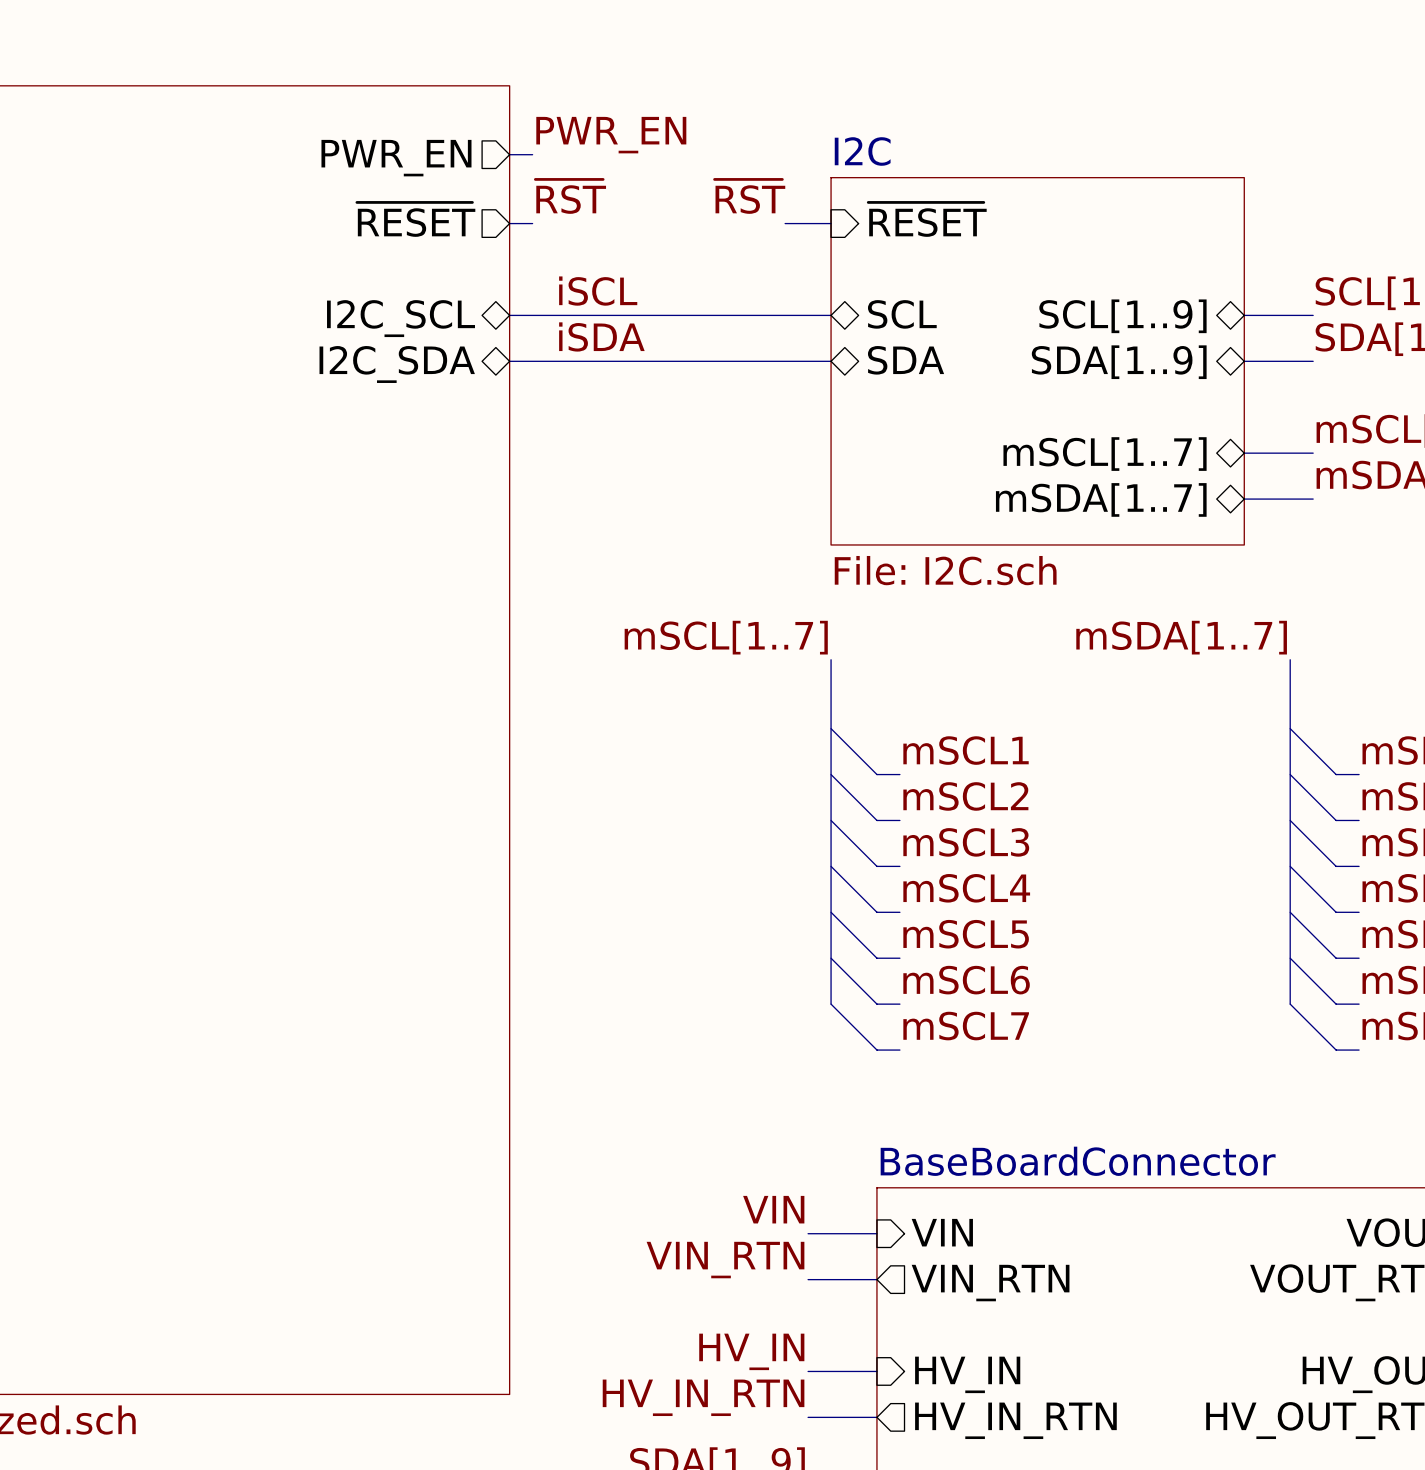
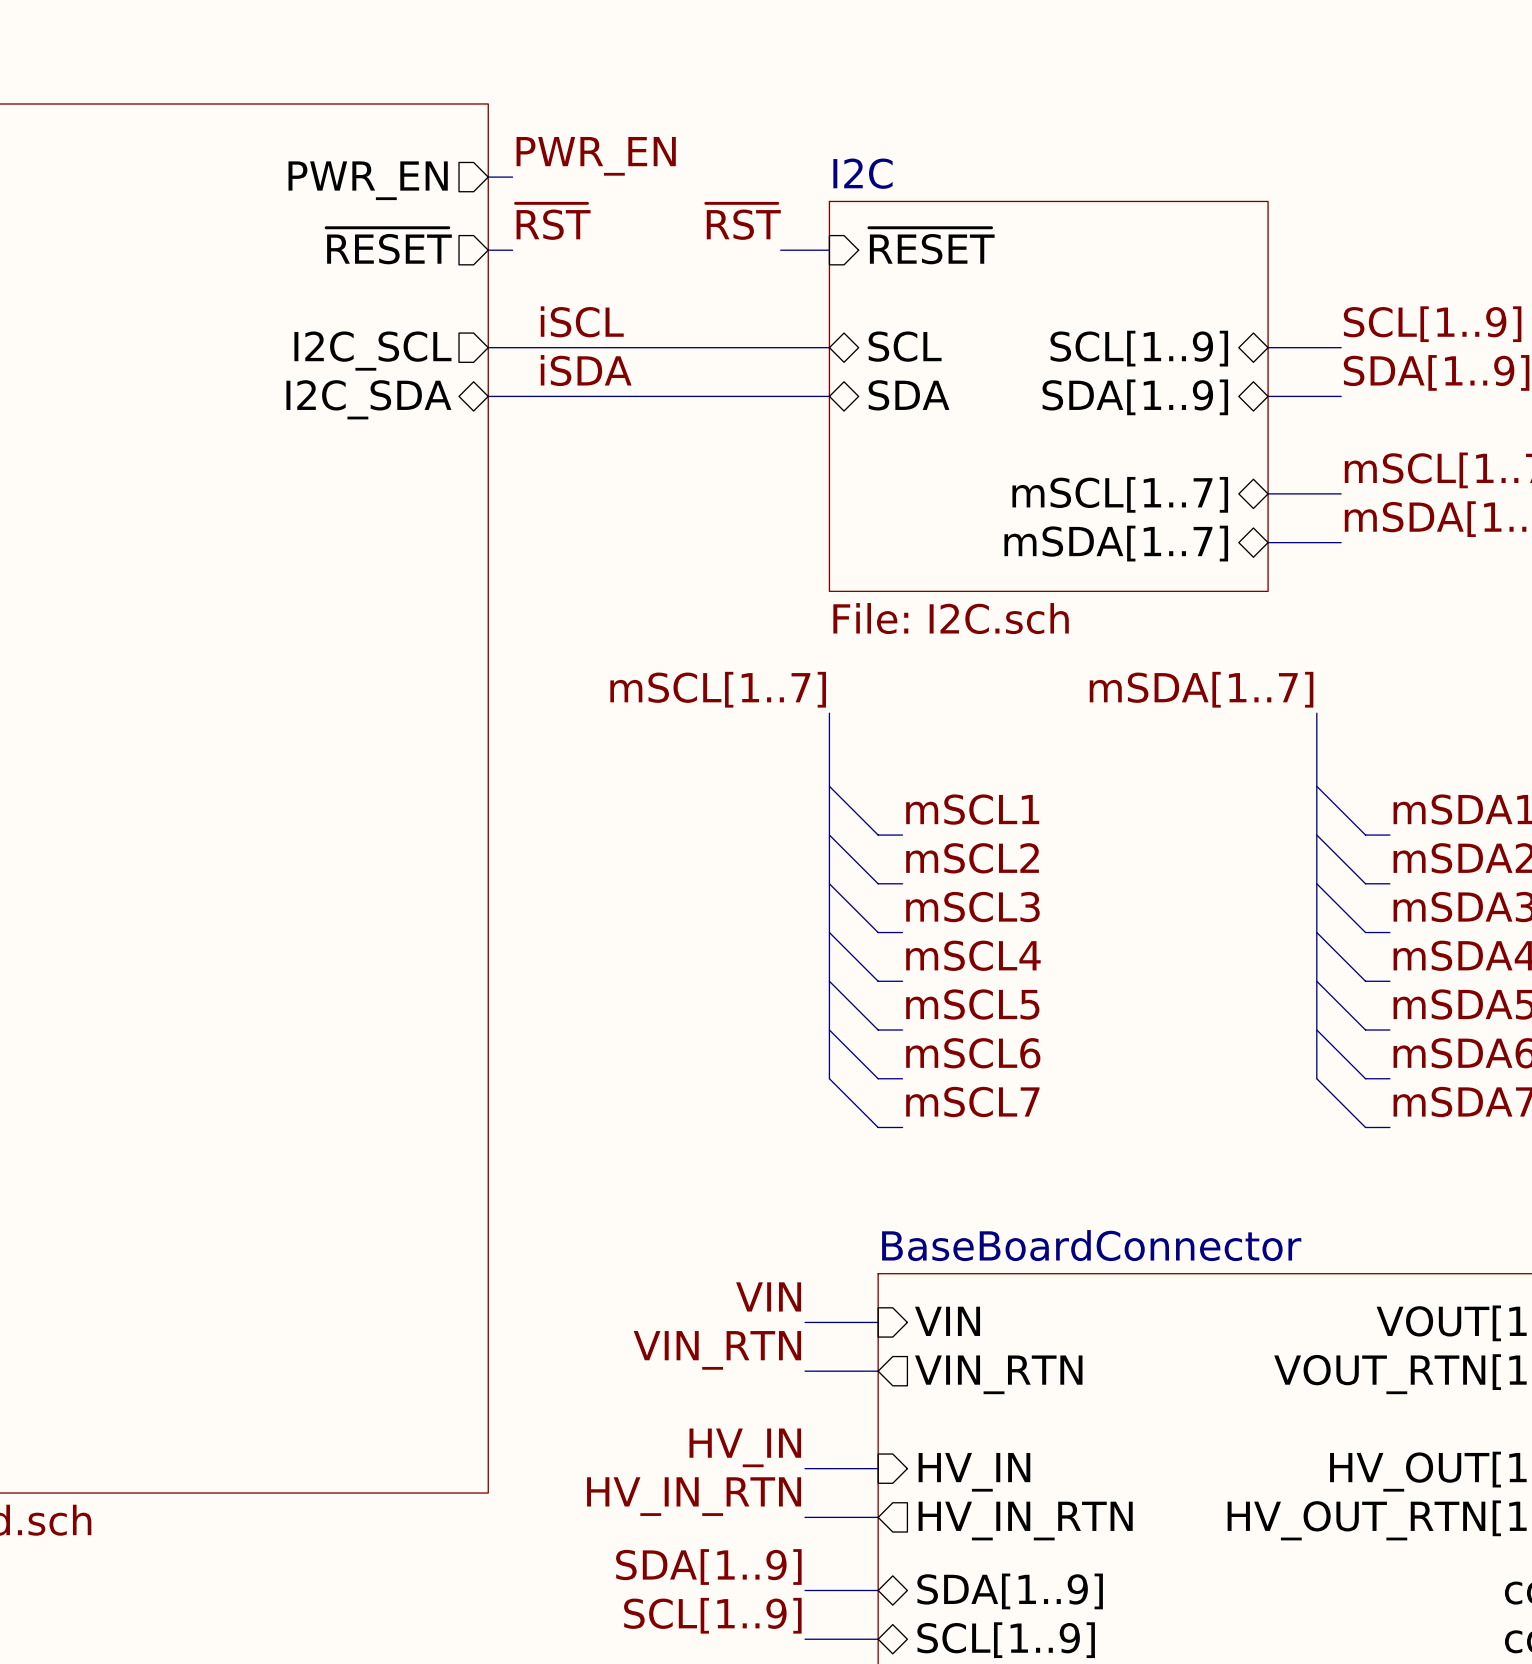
sheet pin shape: bidirectional (401, 318) -> output (372, 351)

